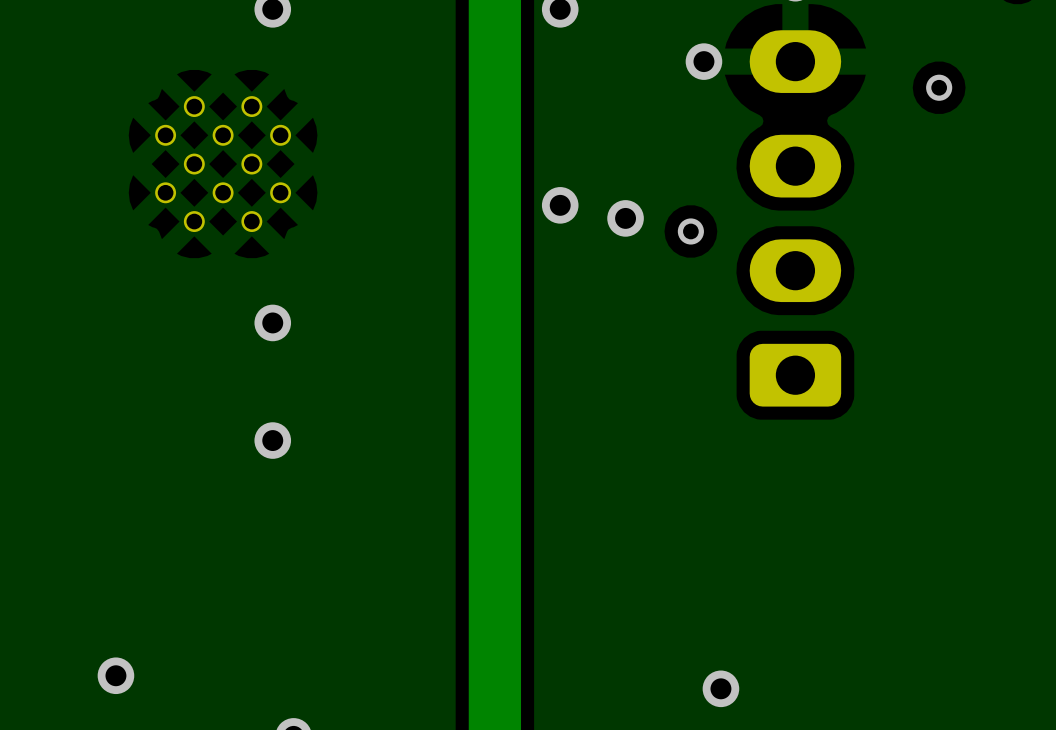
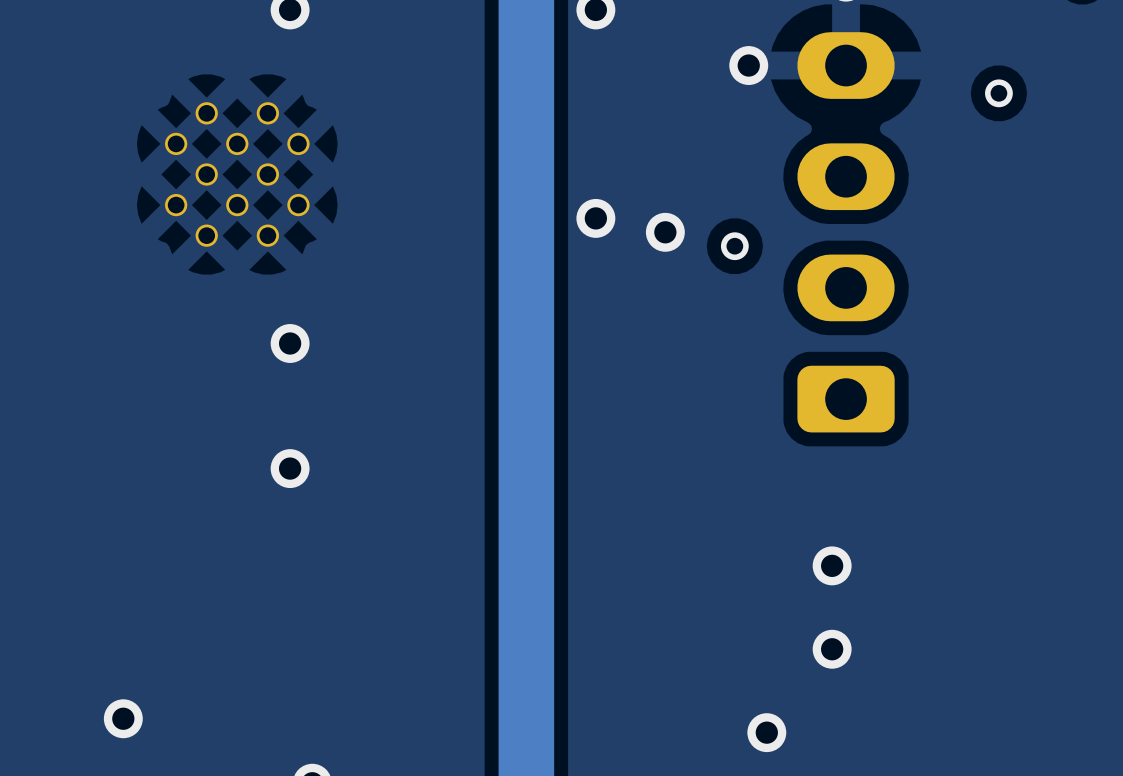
via: none -> (832, 565)
via: none -> (832, 649)

